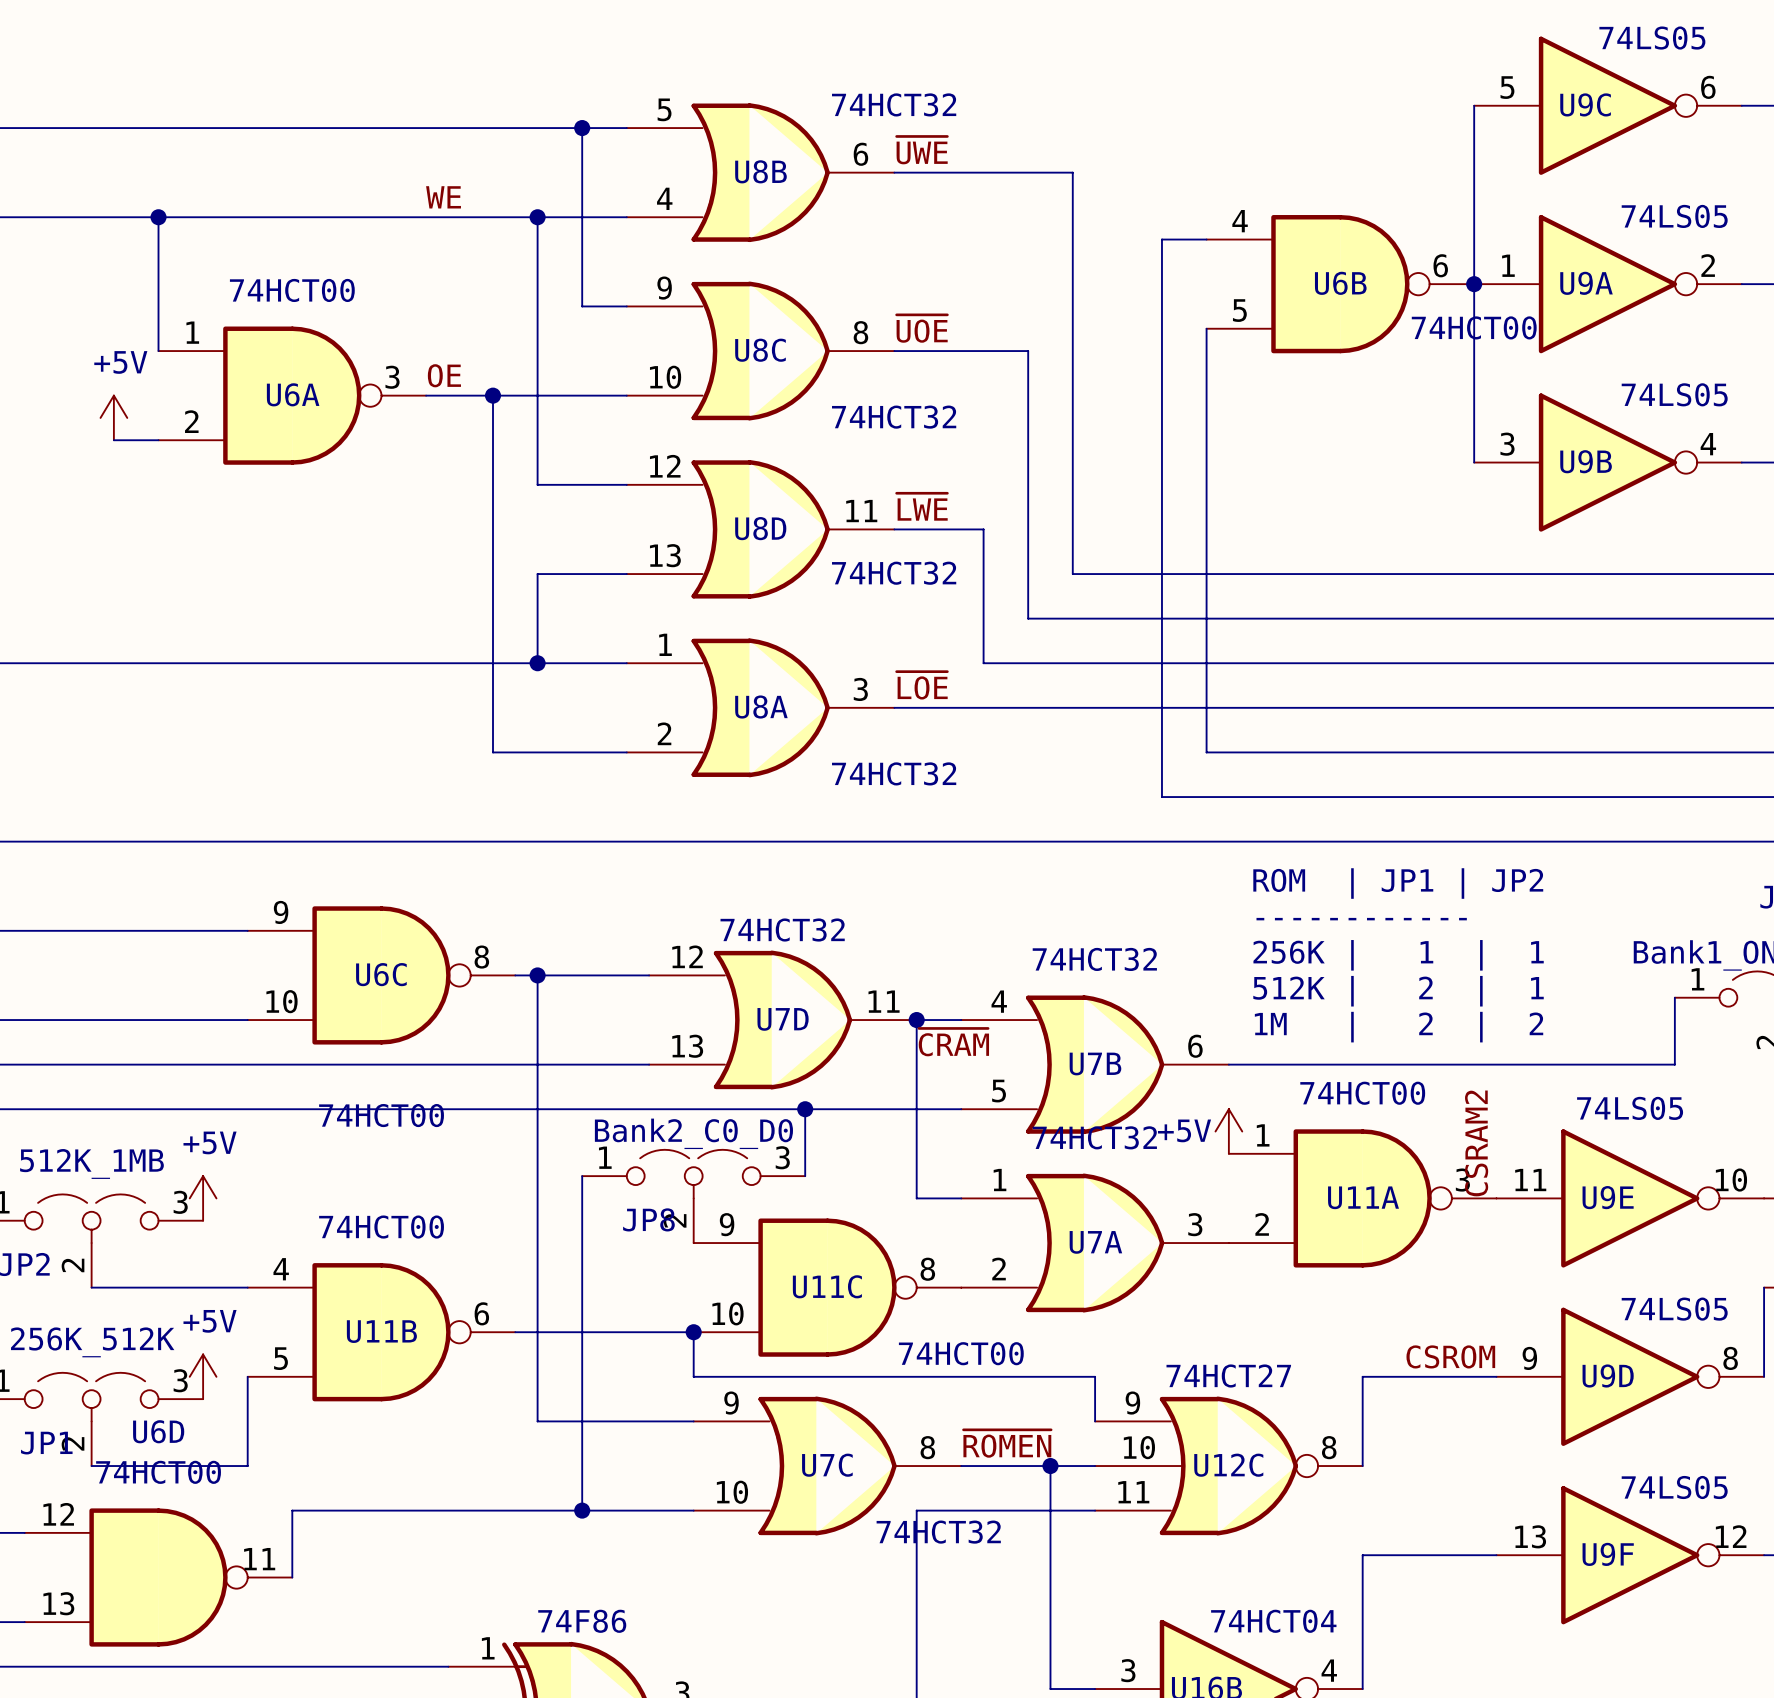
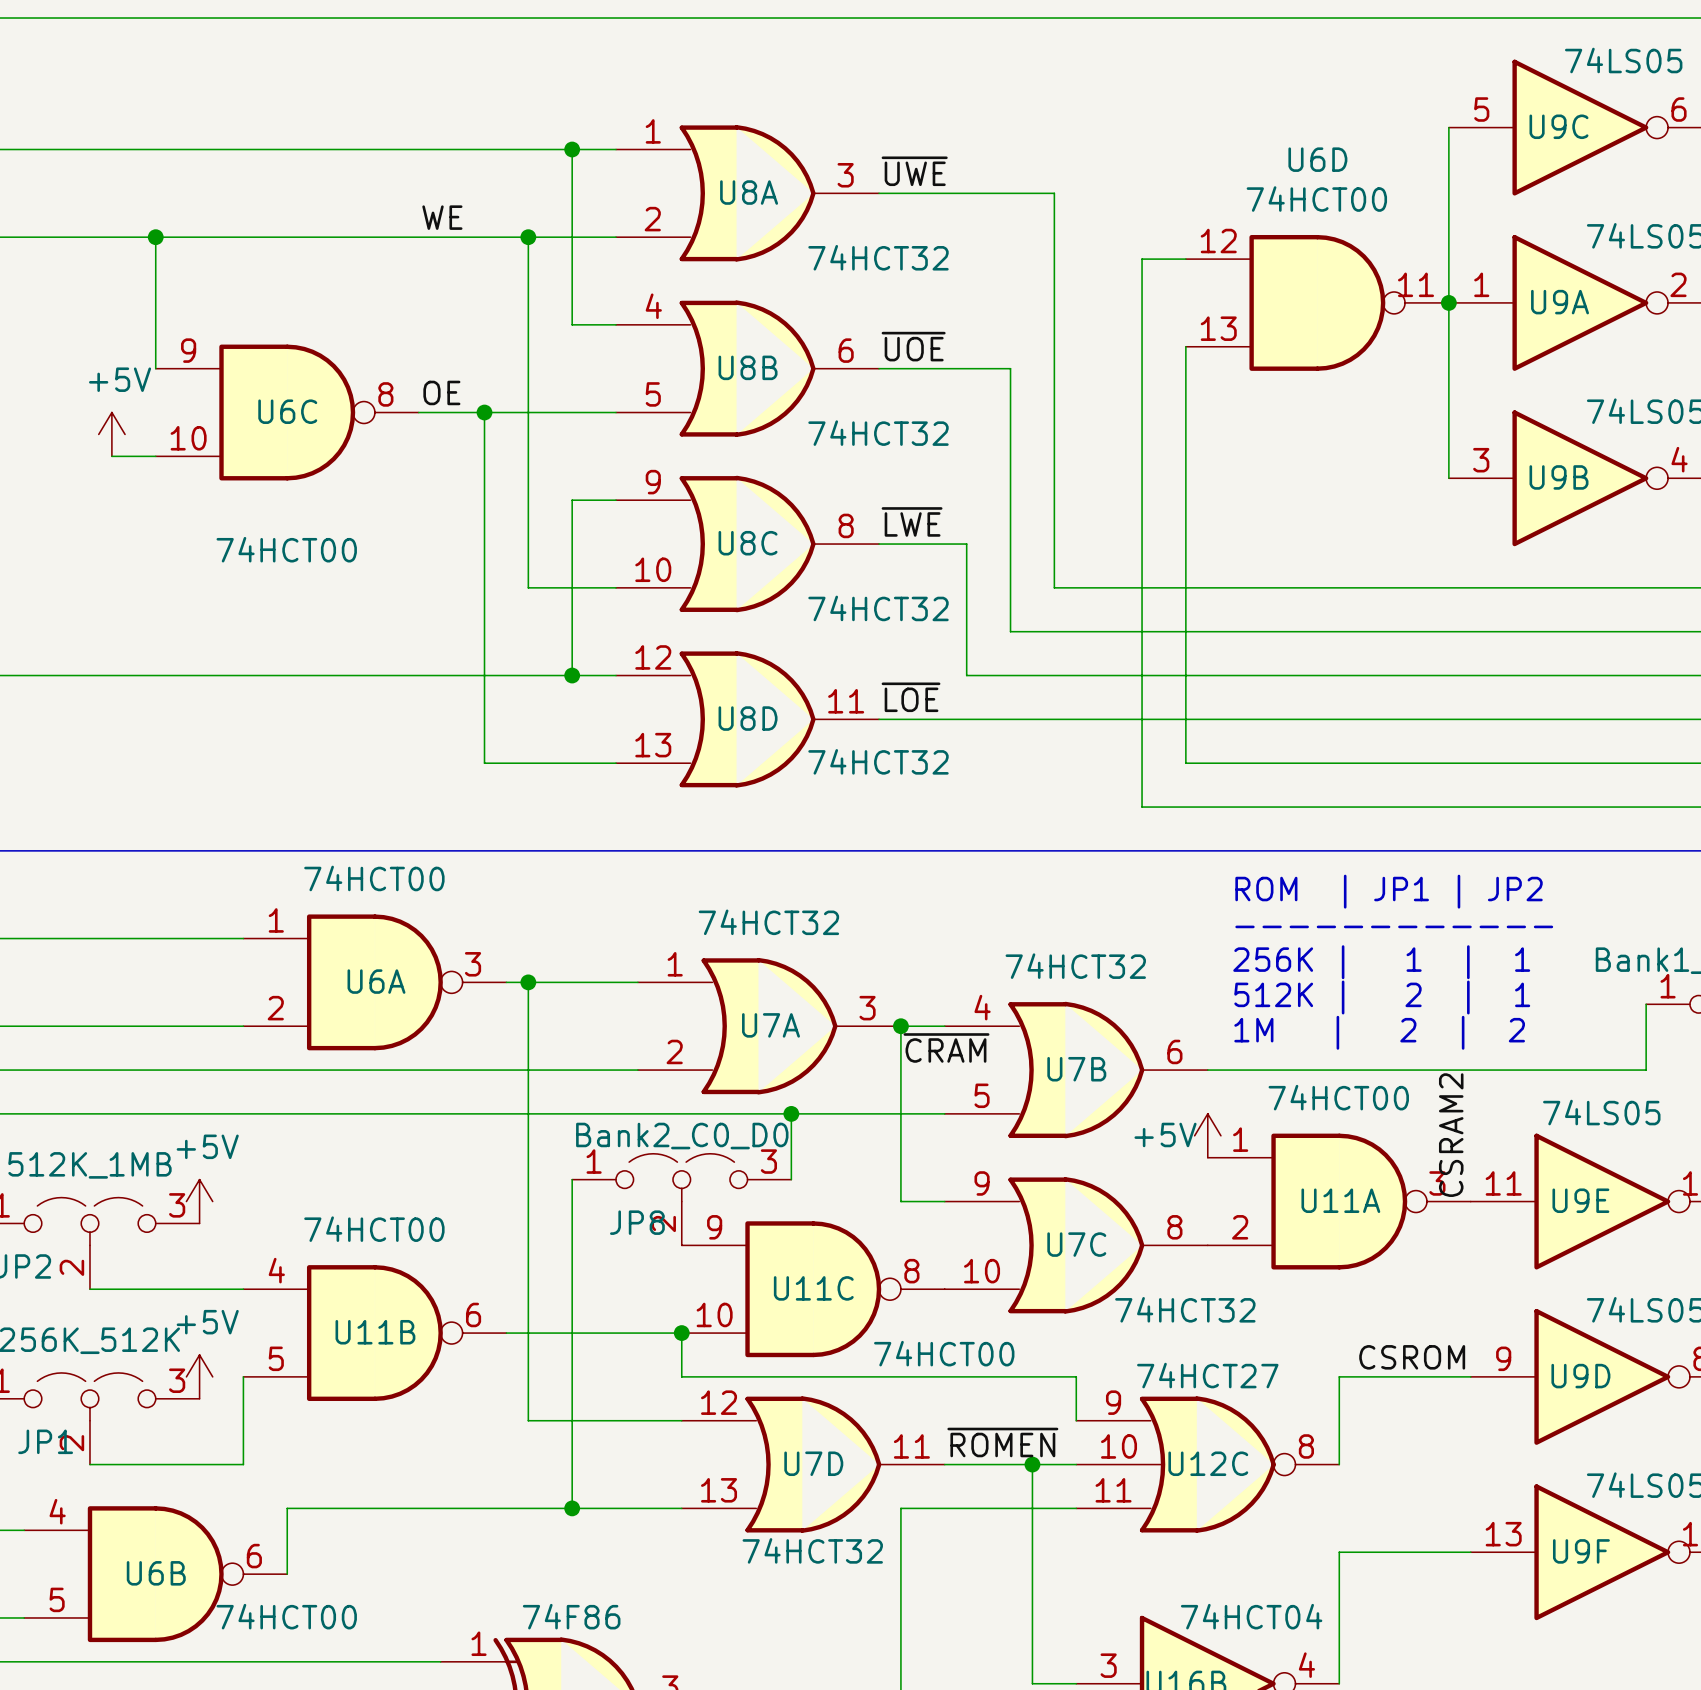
U8B flip: as is (760, 172) -> up-down (747, 368)
U8B position: (760, 172) -> (747, 368)
U6B position: (1340, 284) -> (155, 1574)
U8C position: (760, 351) -> (747, 544)
U6A position: (292, 395) -> (374, 982)
wire: (537, 484) (582, 484) -> (528, 500) (528, 587)
wire: none -> (572, 500) (572, 675)
U8D position: (760, 529) -> (747, 719)
wire: (537, 574) (537, 663) -> none
junction position: (537, 663) -> (572, 675)
U8A position: (760, 707) -> (747, 193)
U7D value position: 74HCT32 (782, 930) -> 74HCT32 (812, 1550)
U6C position: (381, 975) -> (287, 412)
U7D position: (782, 1020) -> (813, 1464)
U7A position: (1095, 1243) -> (769, 1026)
U7C position: (827, 1466) -> (1076, 1245)
U6D position: (158, 1577) -> (1317, 302)

